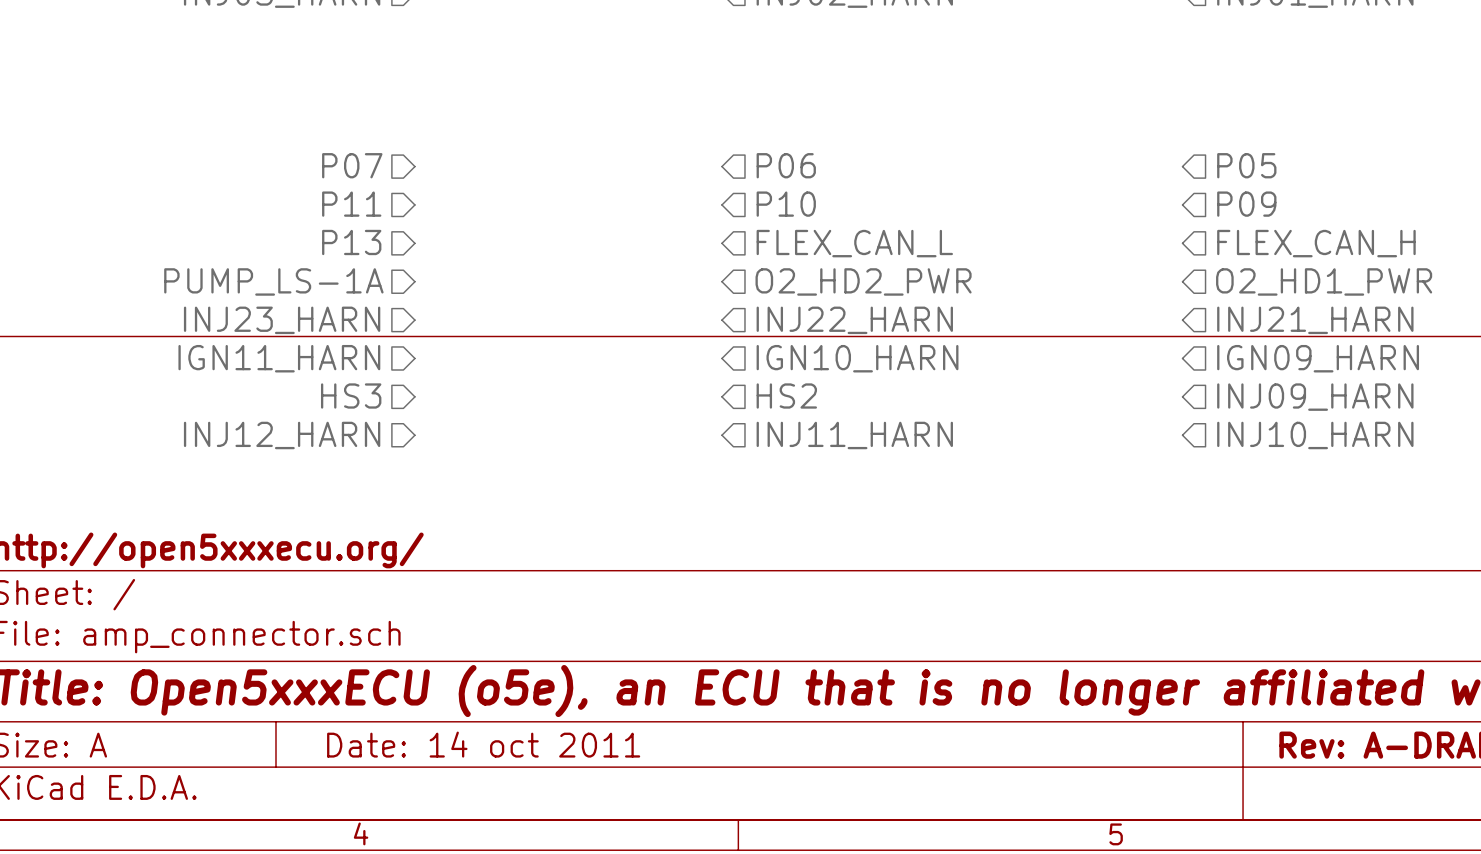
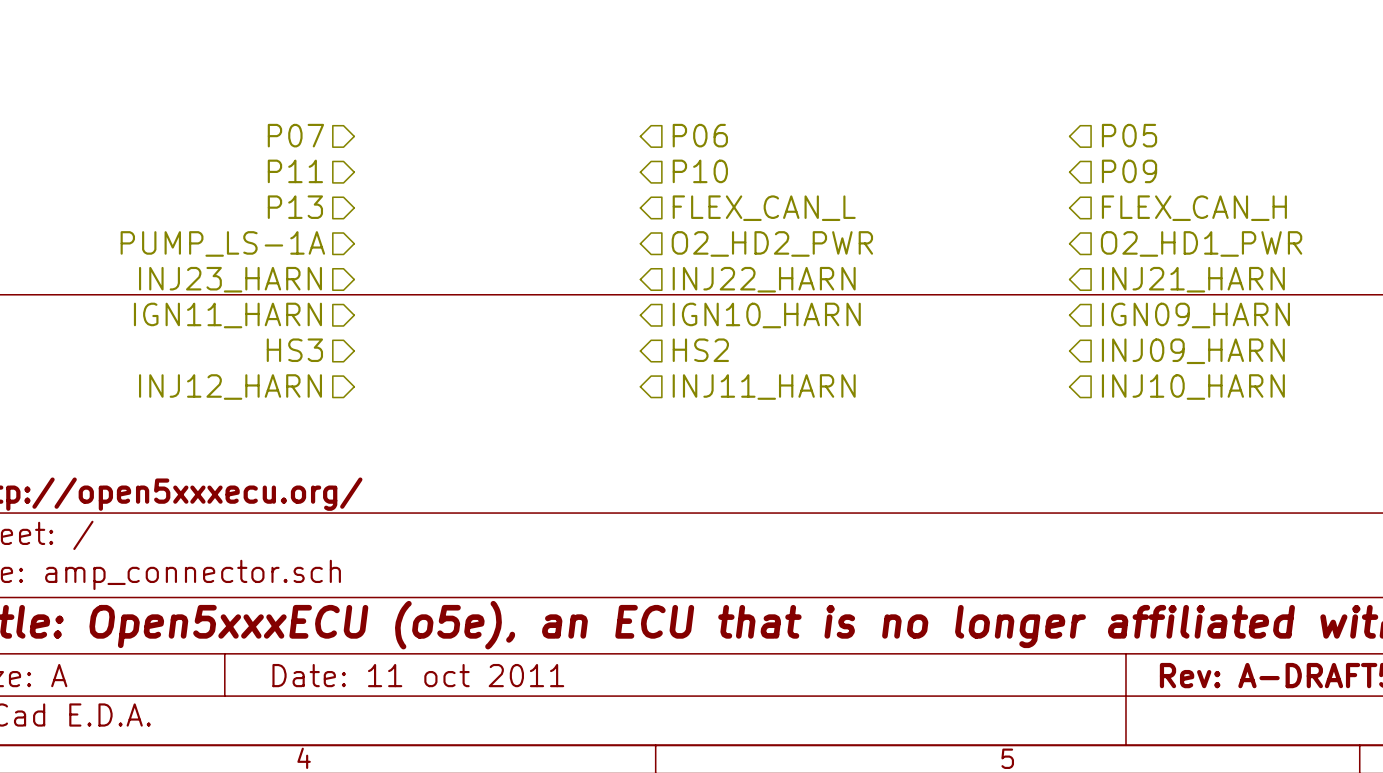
title block: Date: 14 oct 2011 (483, 744) -> Date: 11 oct 2011 (418, 675)

